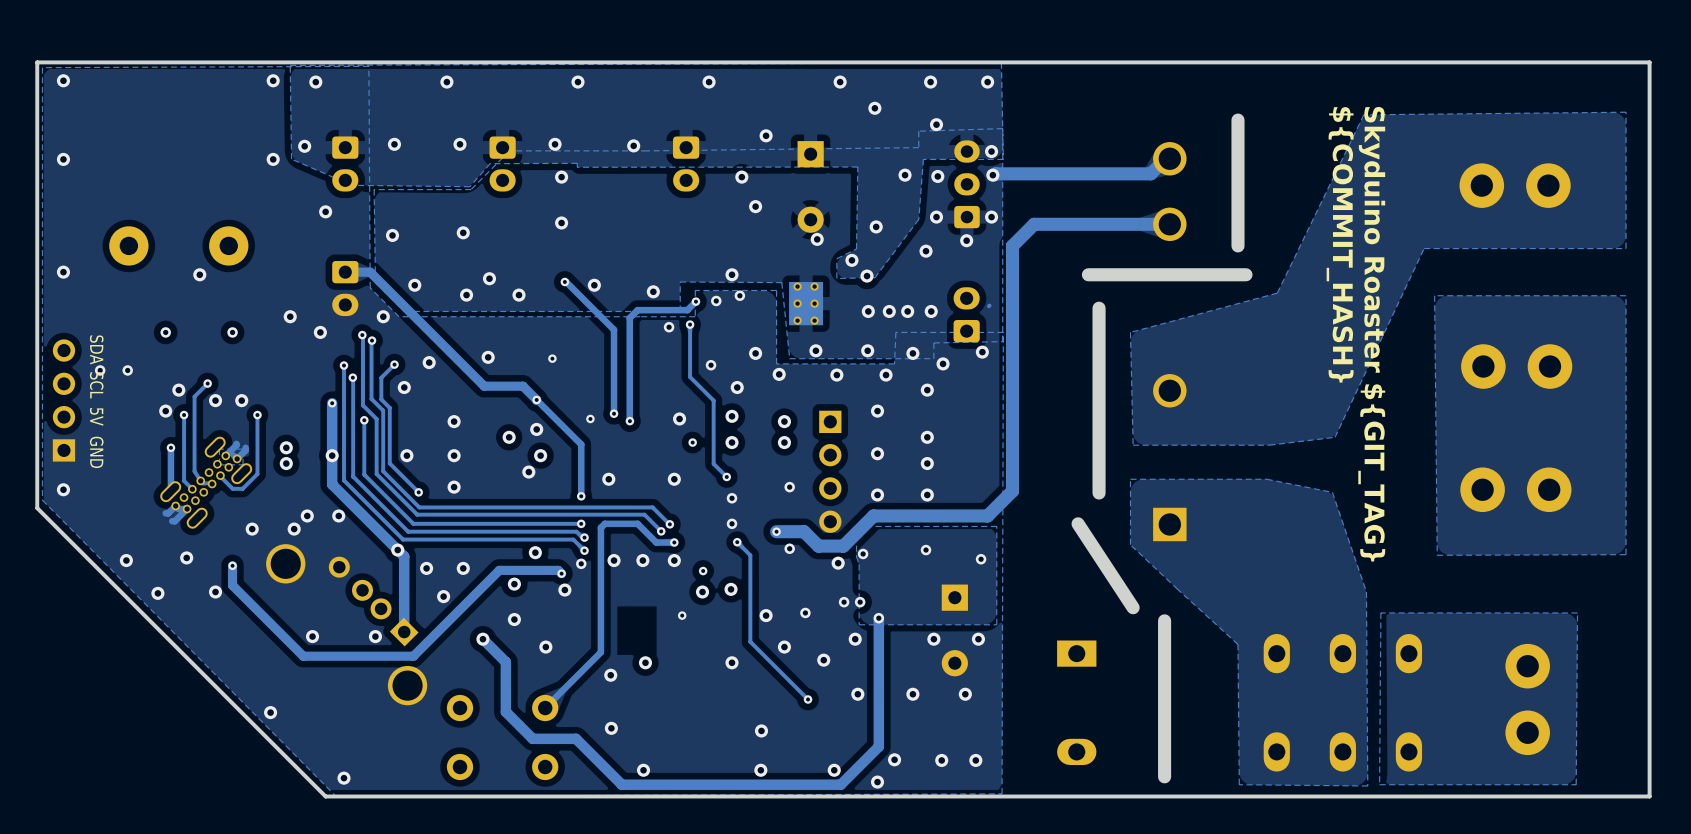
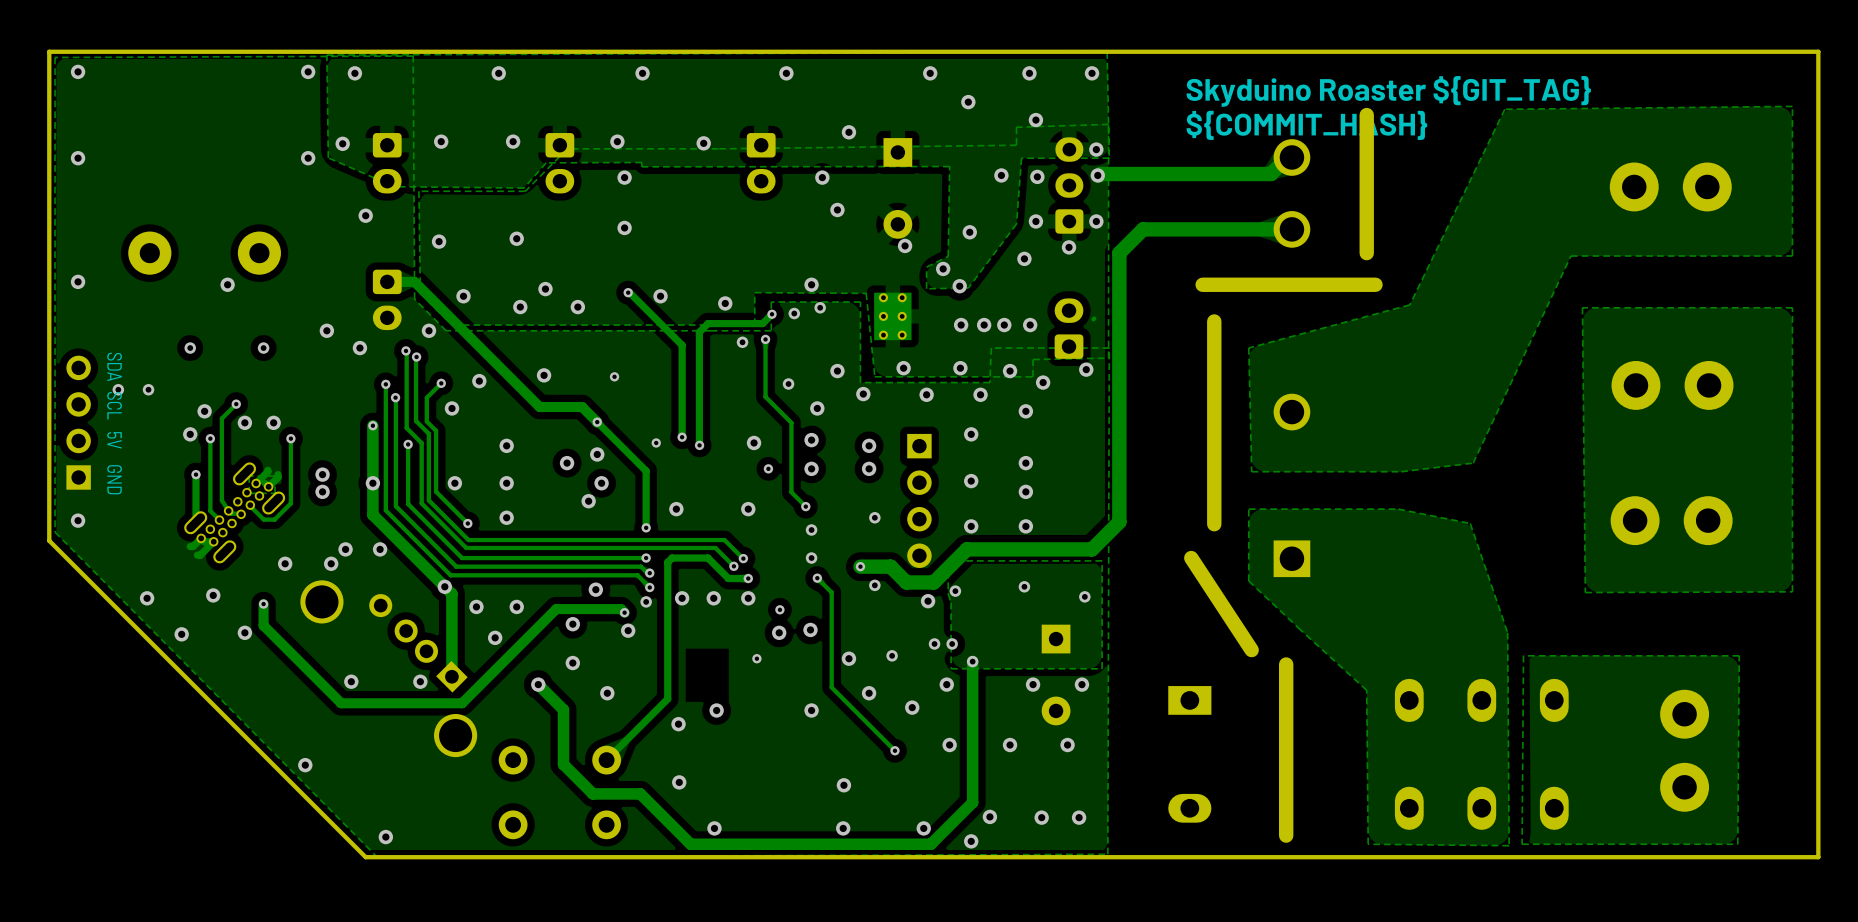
text rotation: 0° (1340, 244) -> 90° counterclockwise (1306, 125)
text rotation: 0° (1371, 334) -> 90° counterclockwise (1388, 91)

